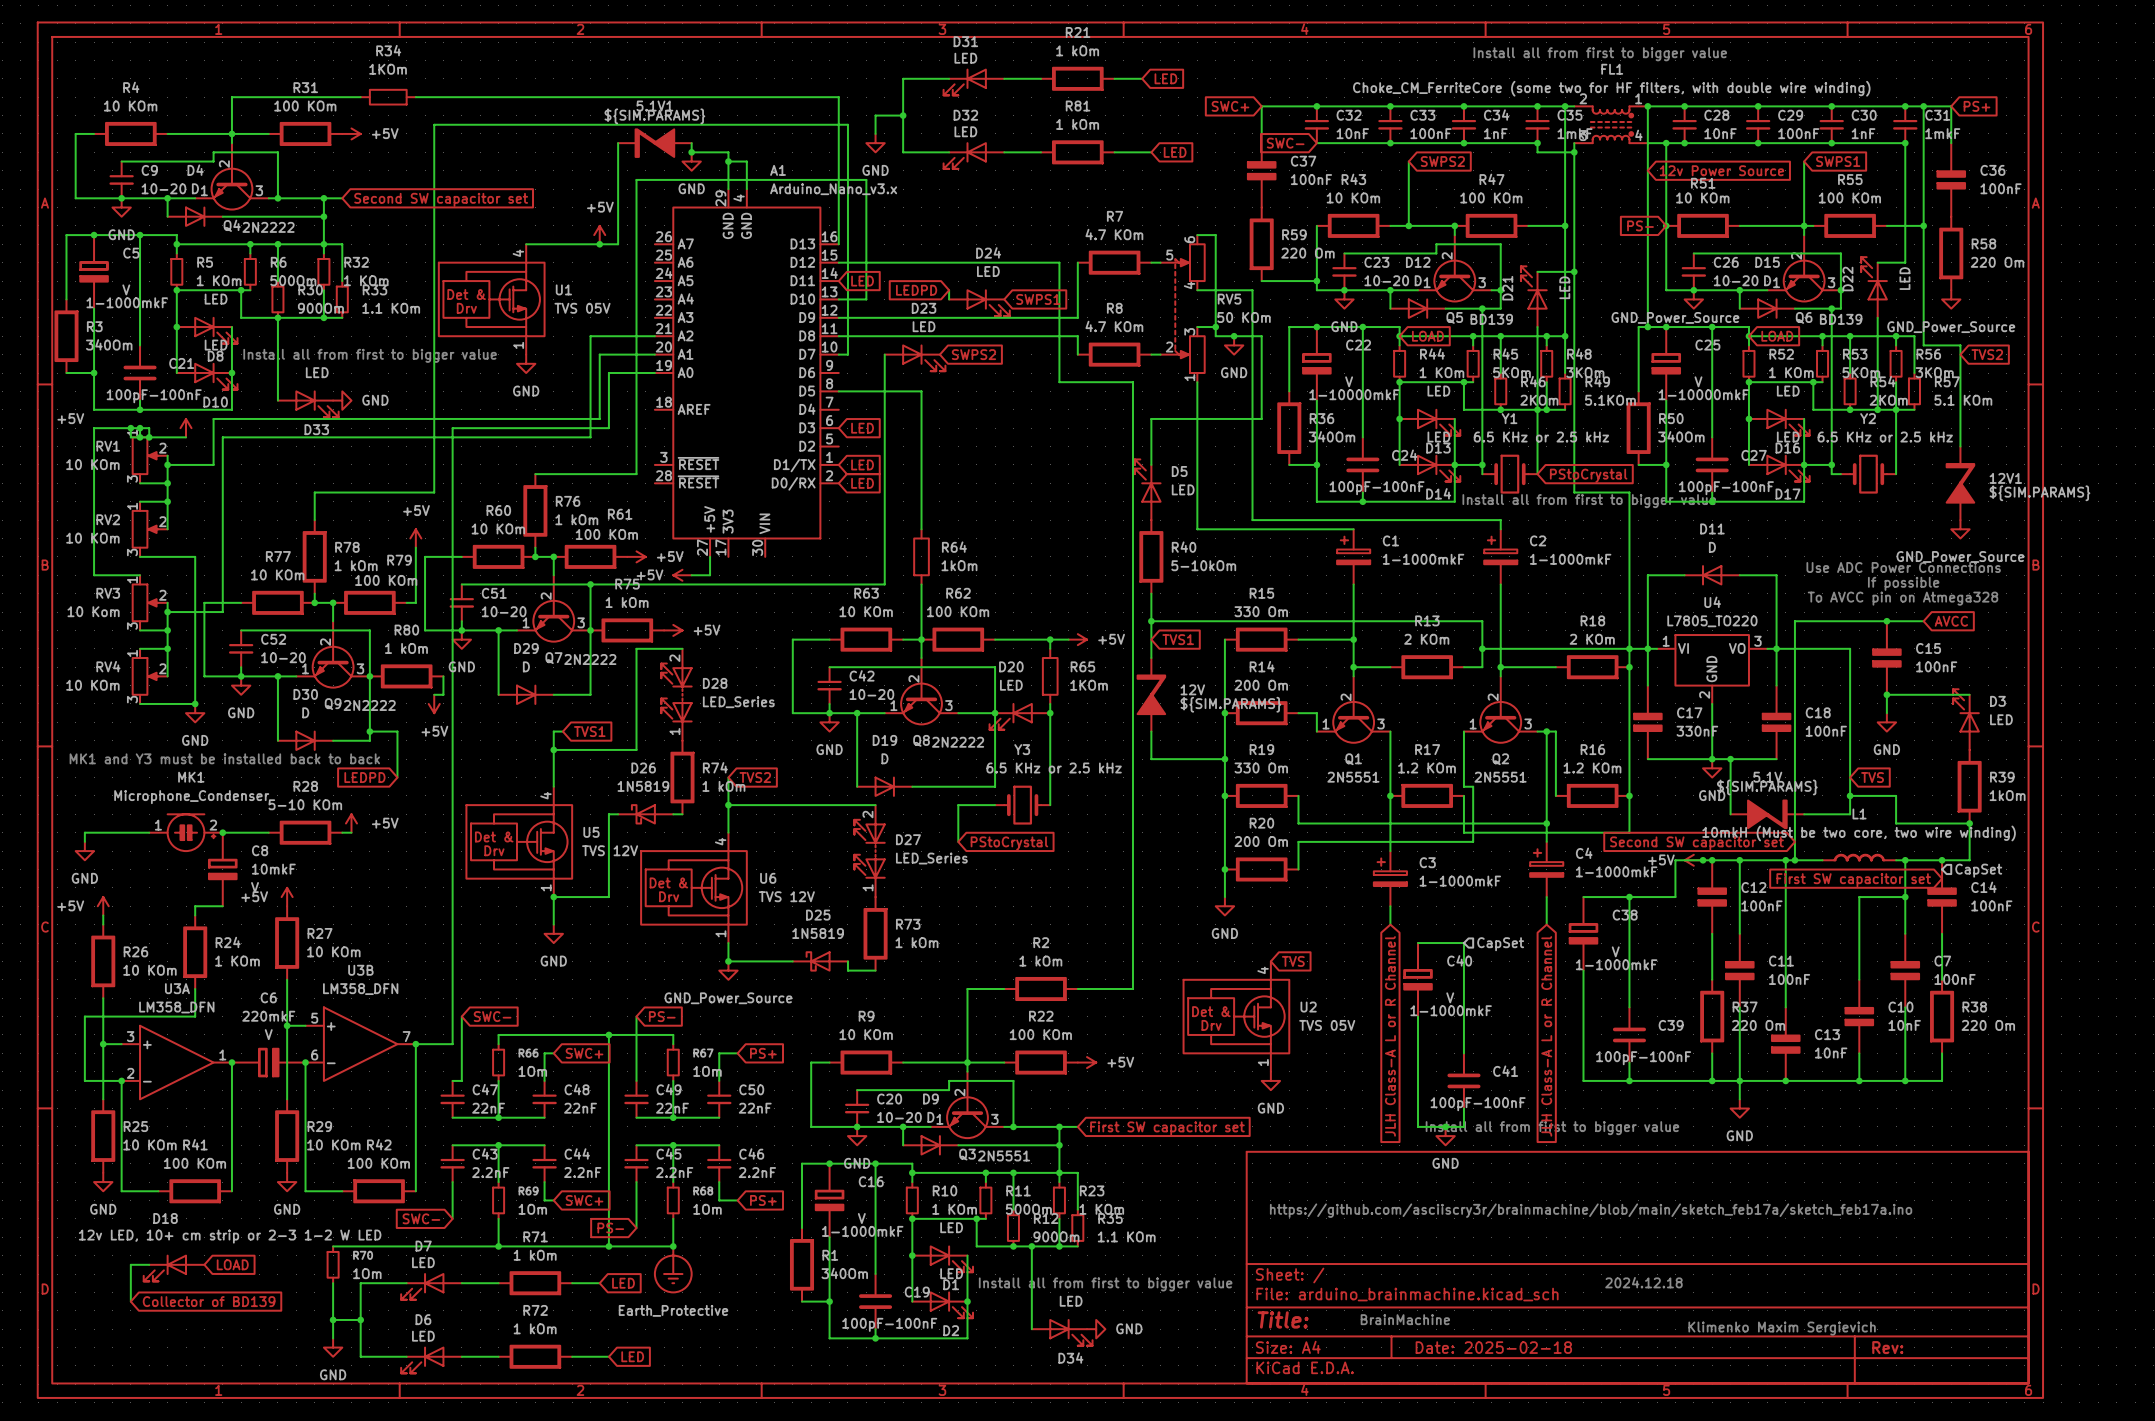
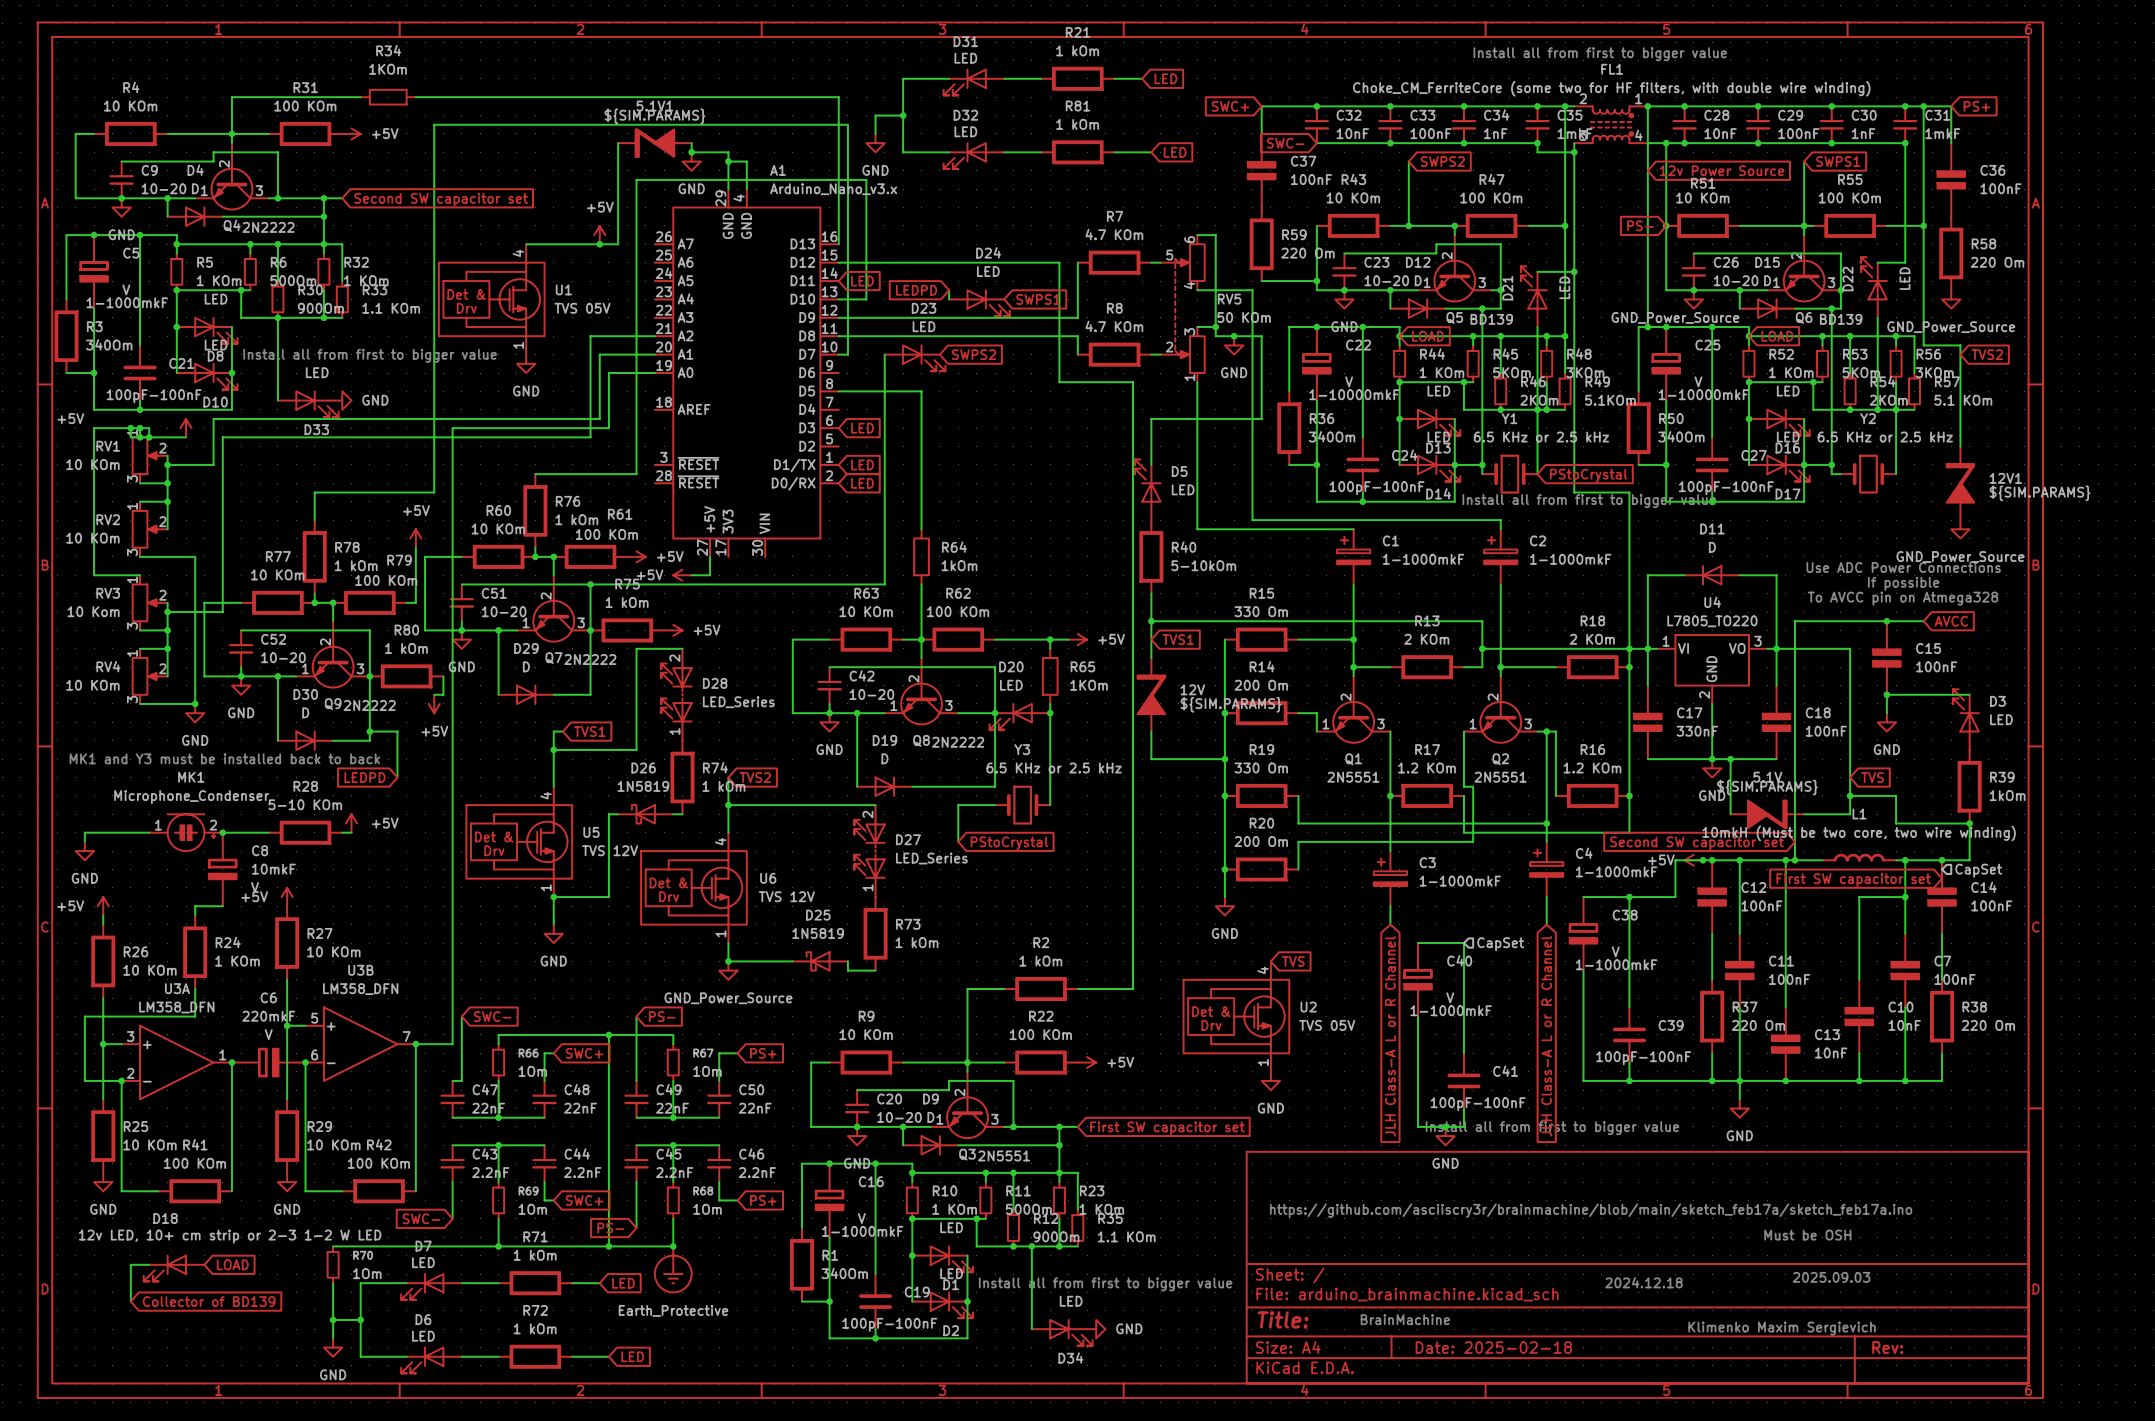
text: none -> Must be OSH (1807, 1235)
text: none -> 2025.09.03 (1831, 1277)

